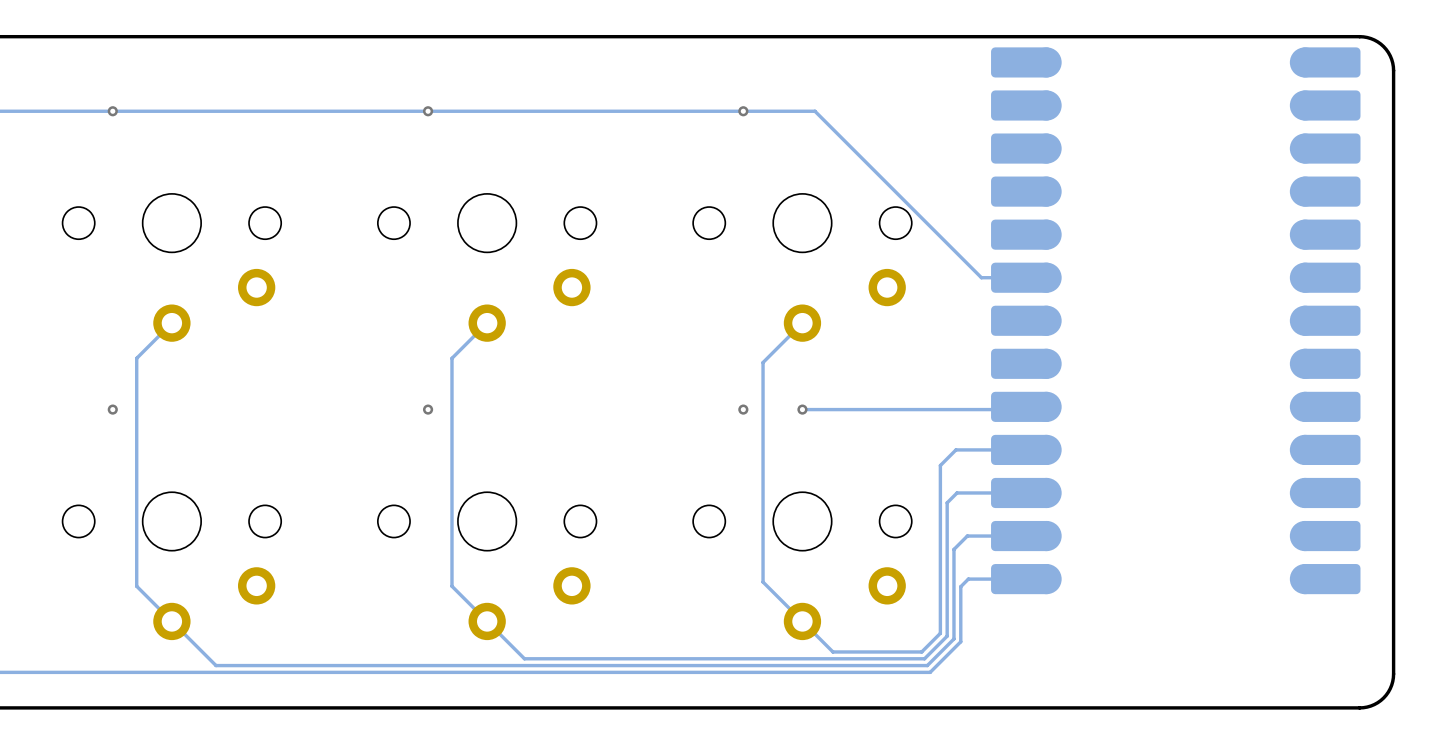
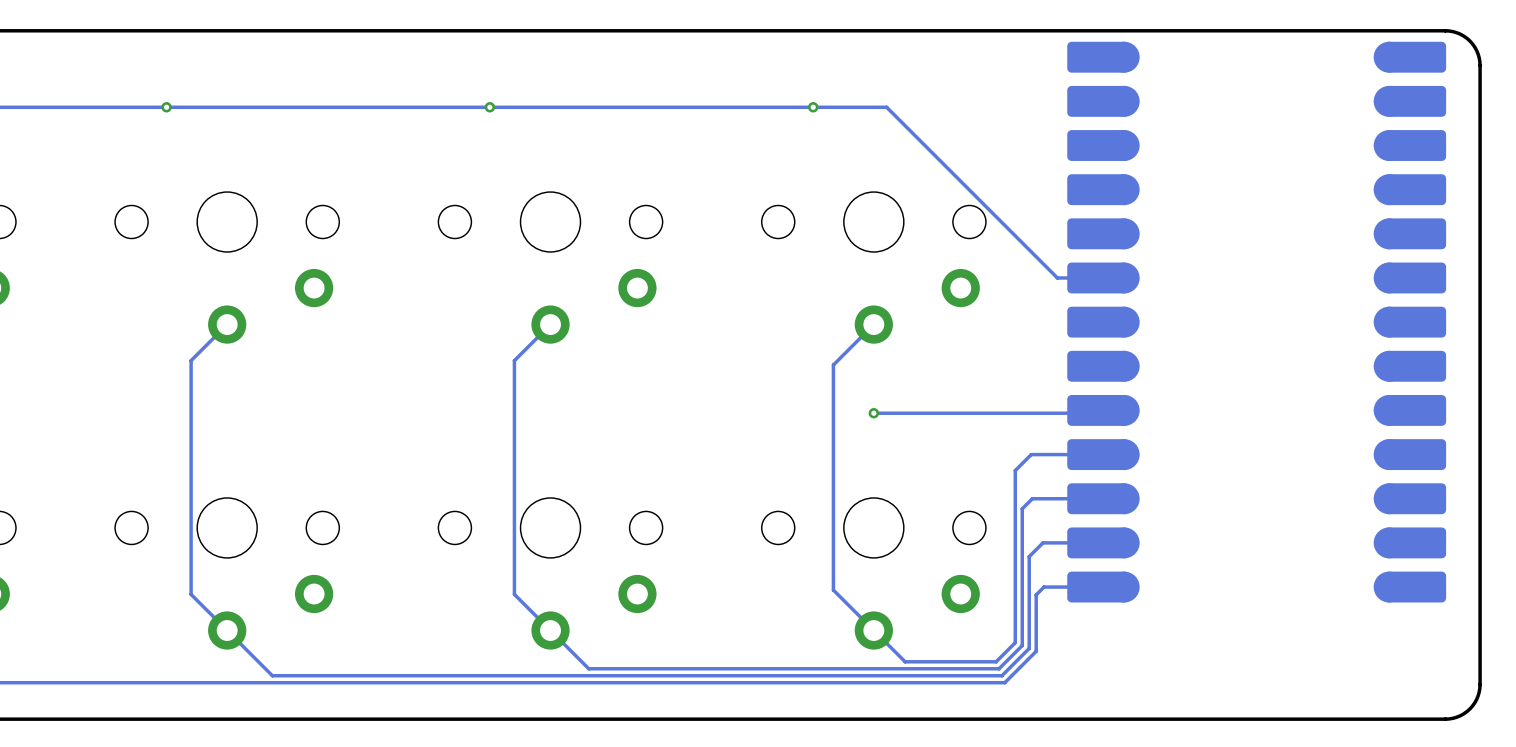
via: (112, 409) -> none
via: (428, 409) -> none
via: (743, 409) -> none

